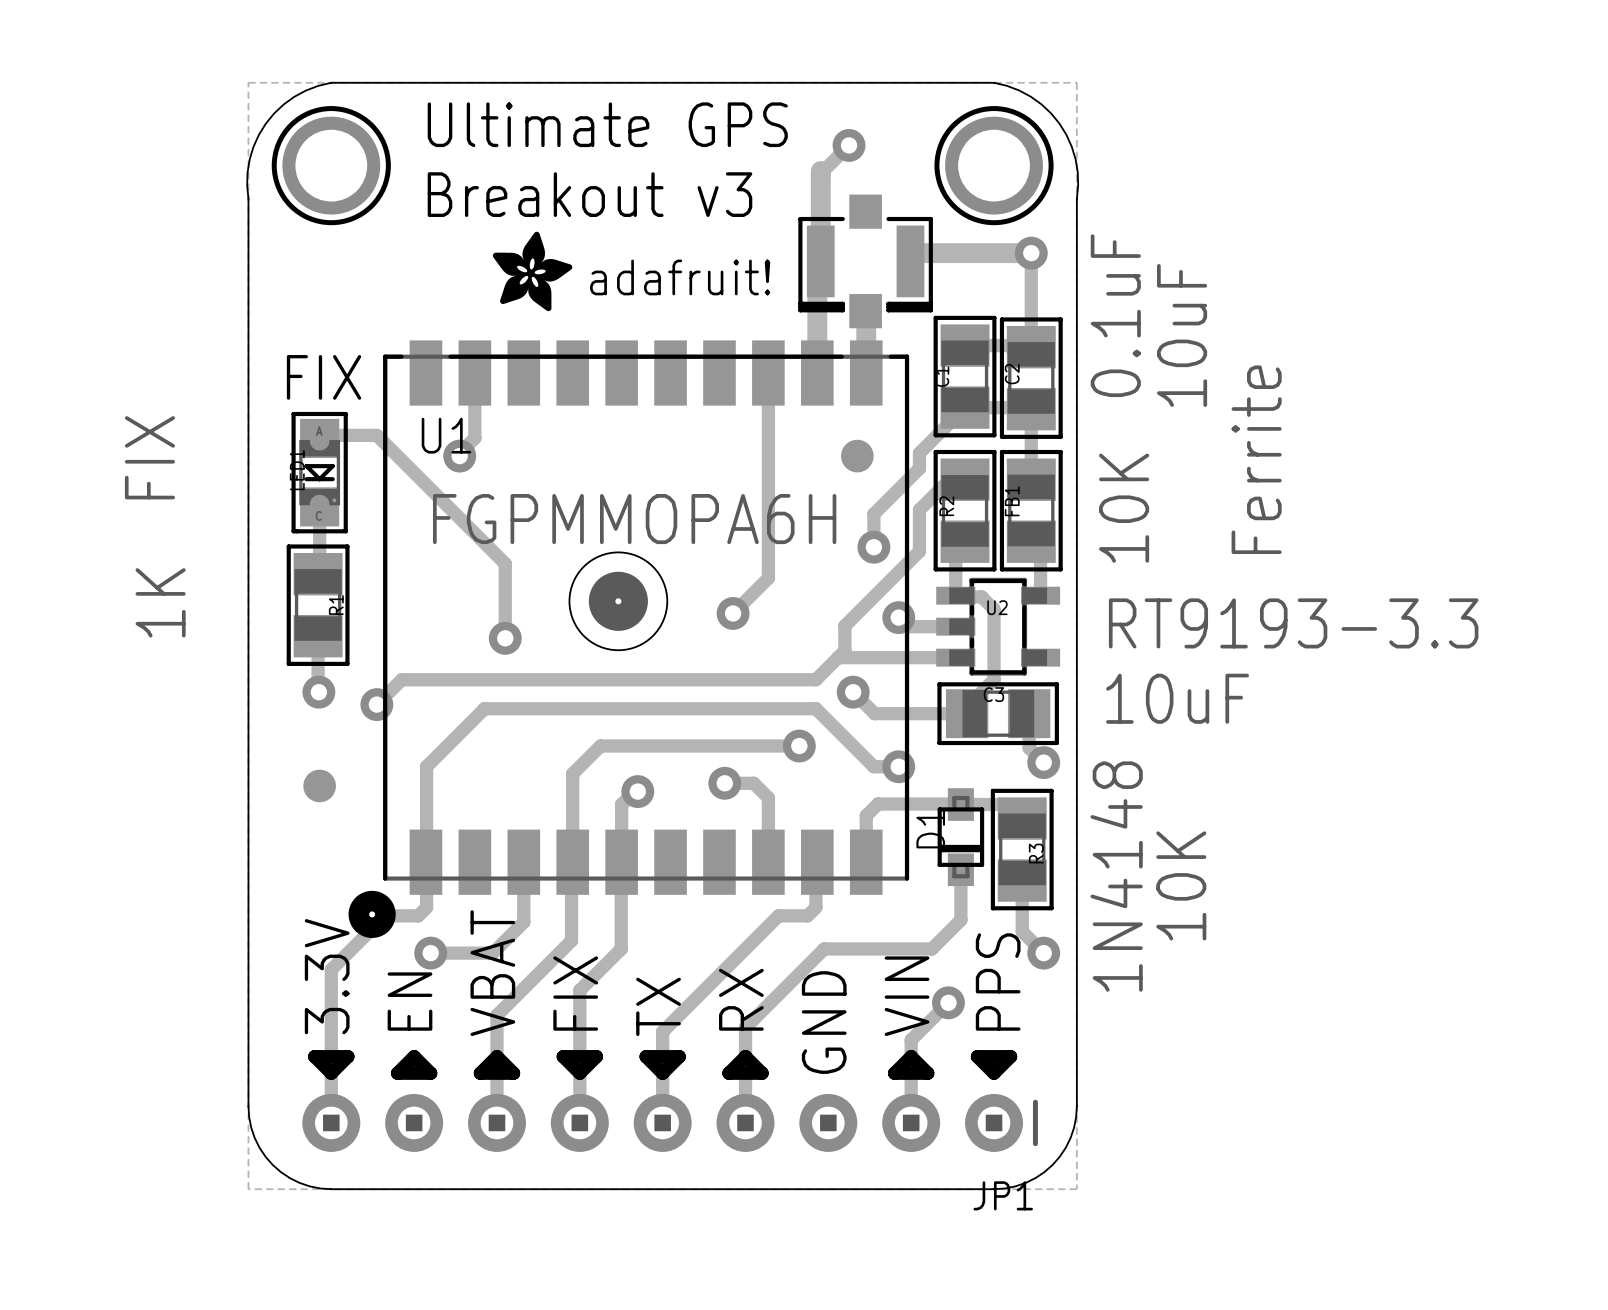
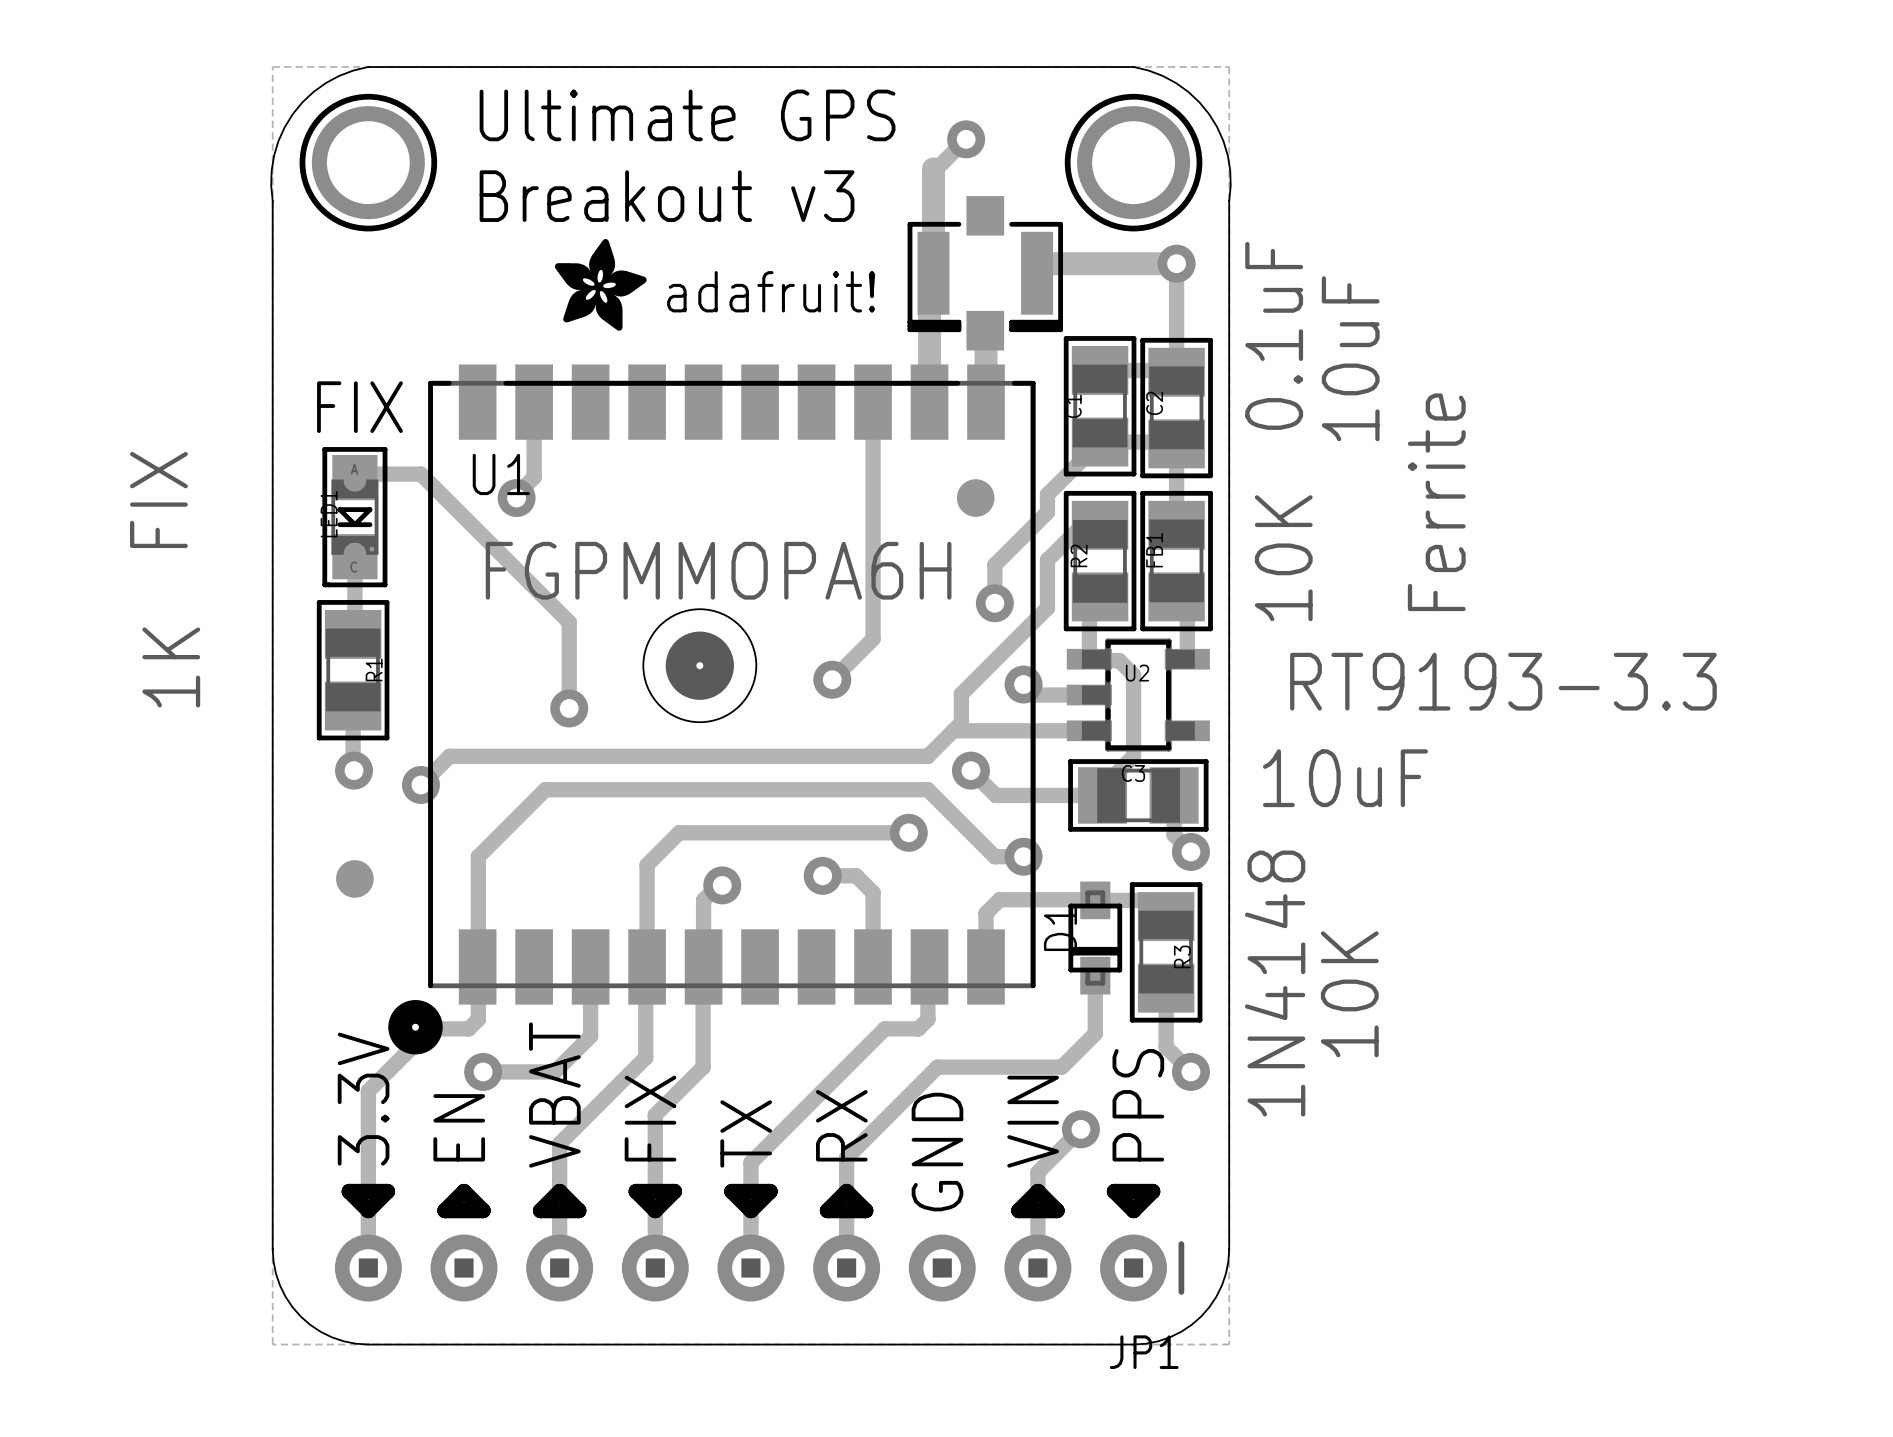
U2 value position: RT9193-3.3 (1293, 623) -> RT9193-3.3 (1503, 681)

